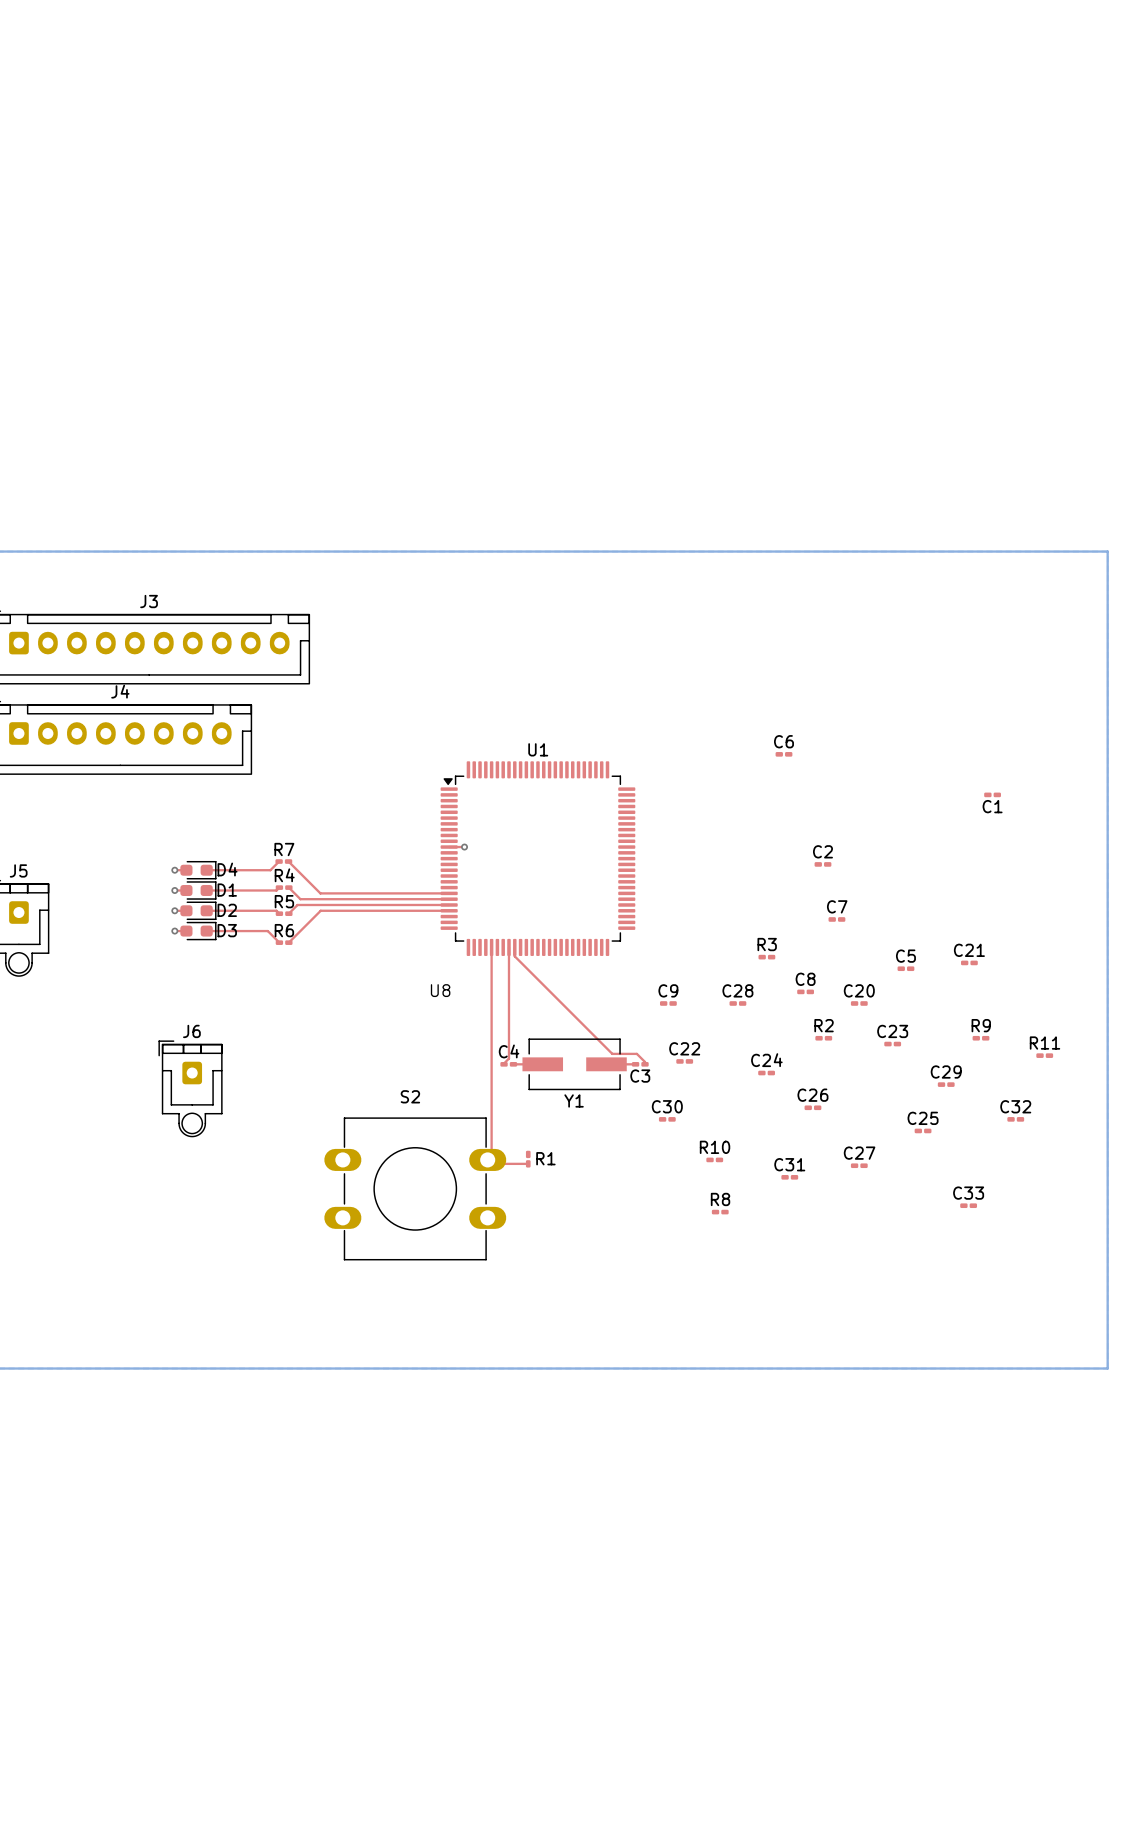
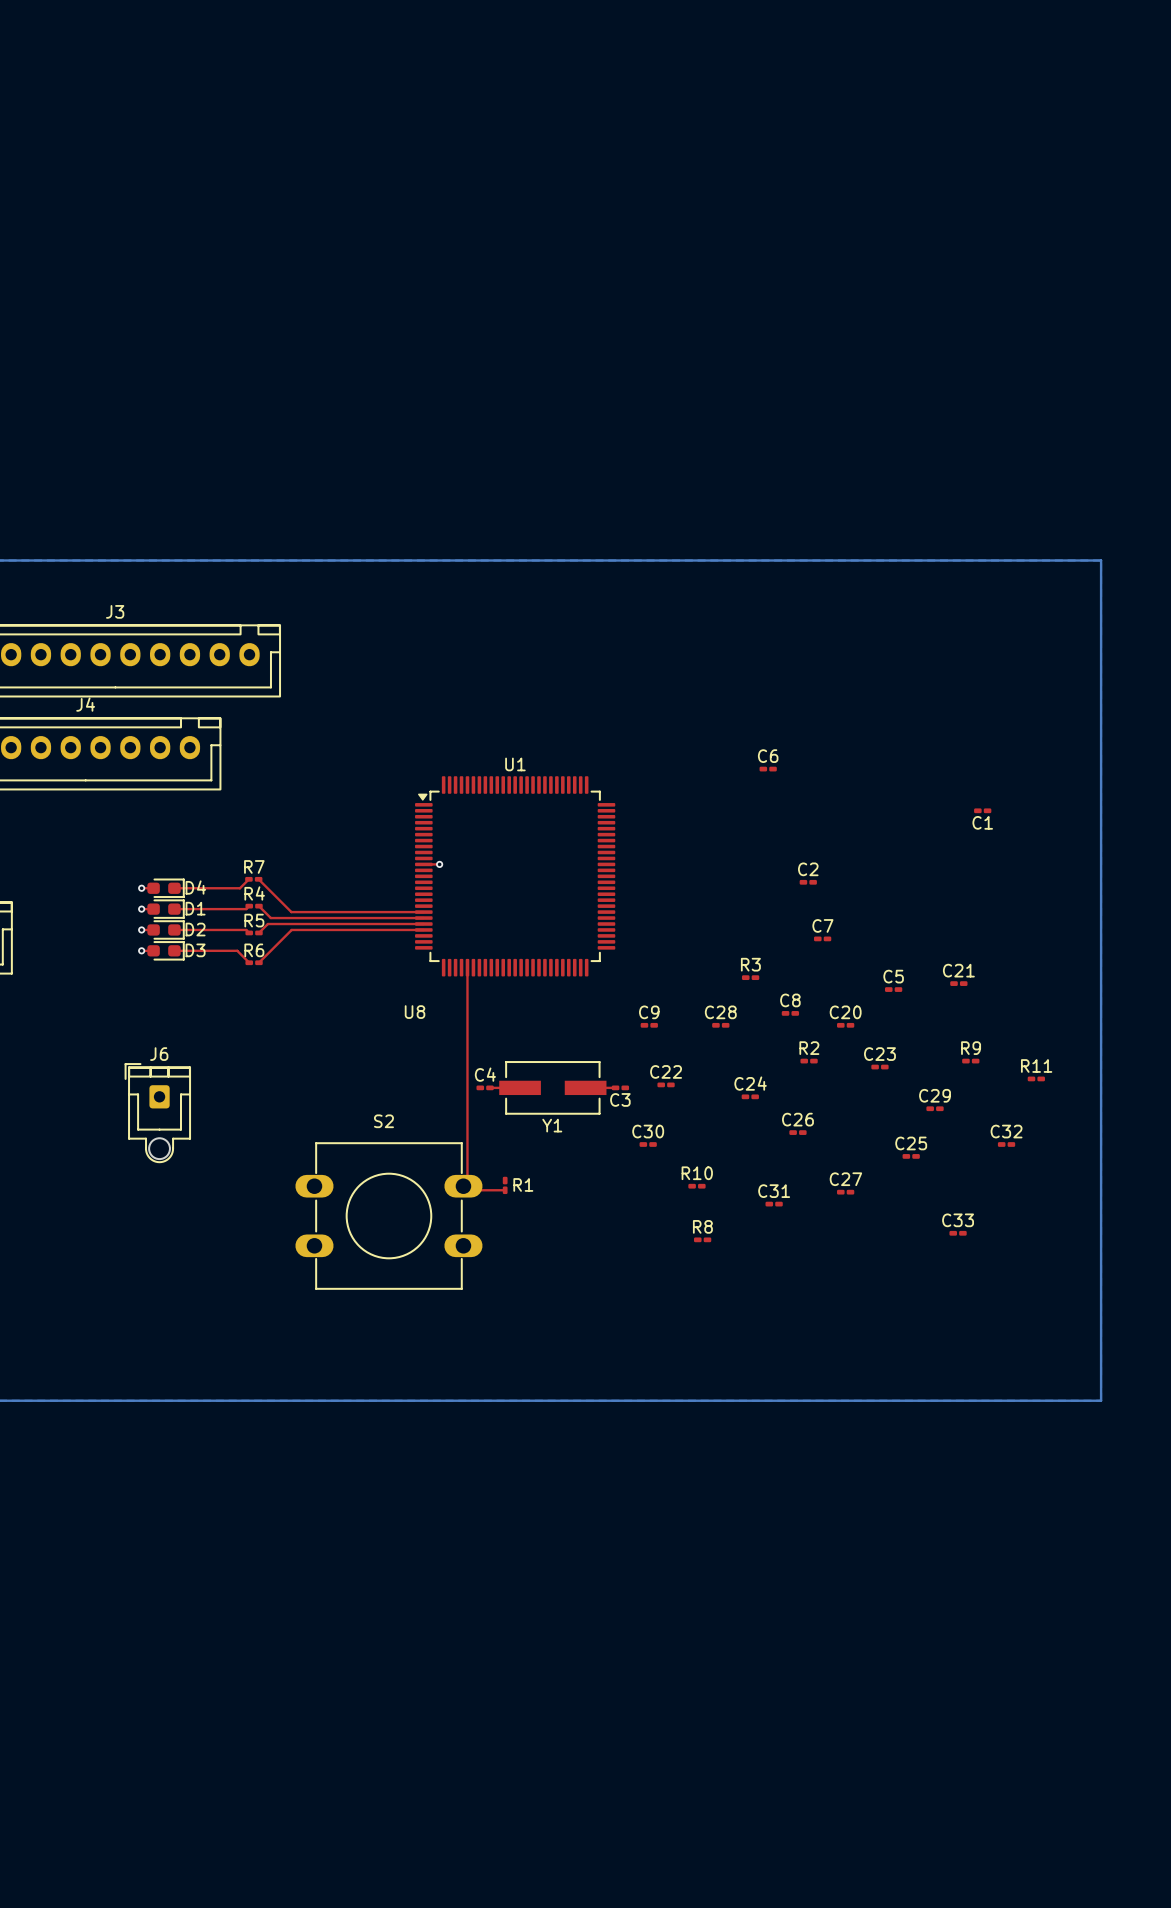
top track: (508, 947) (508, 1058) (504, 1064) -> none
top track: (514, 947) (514, 956) (612, 1053) (636, 1053) (645, 1064) -> none

